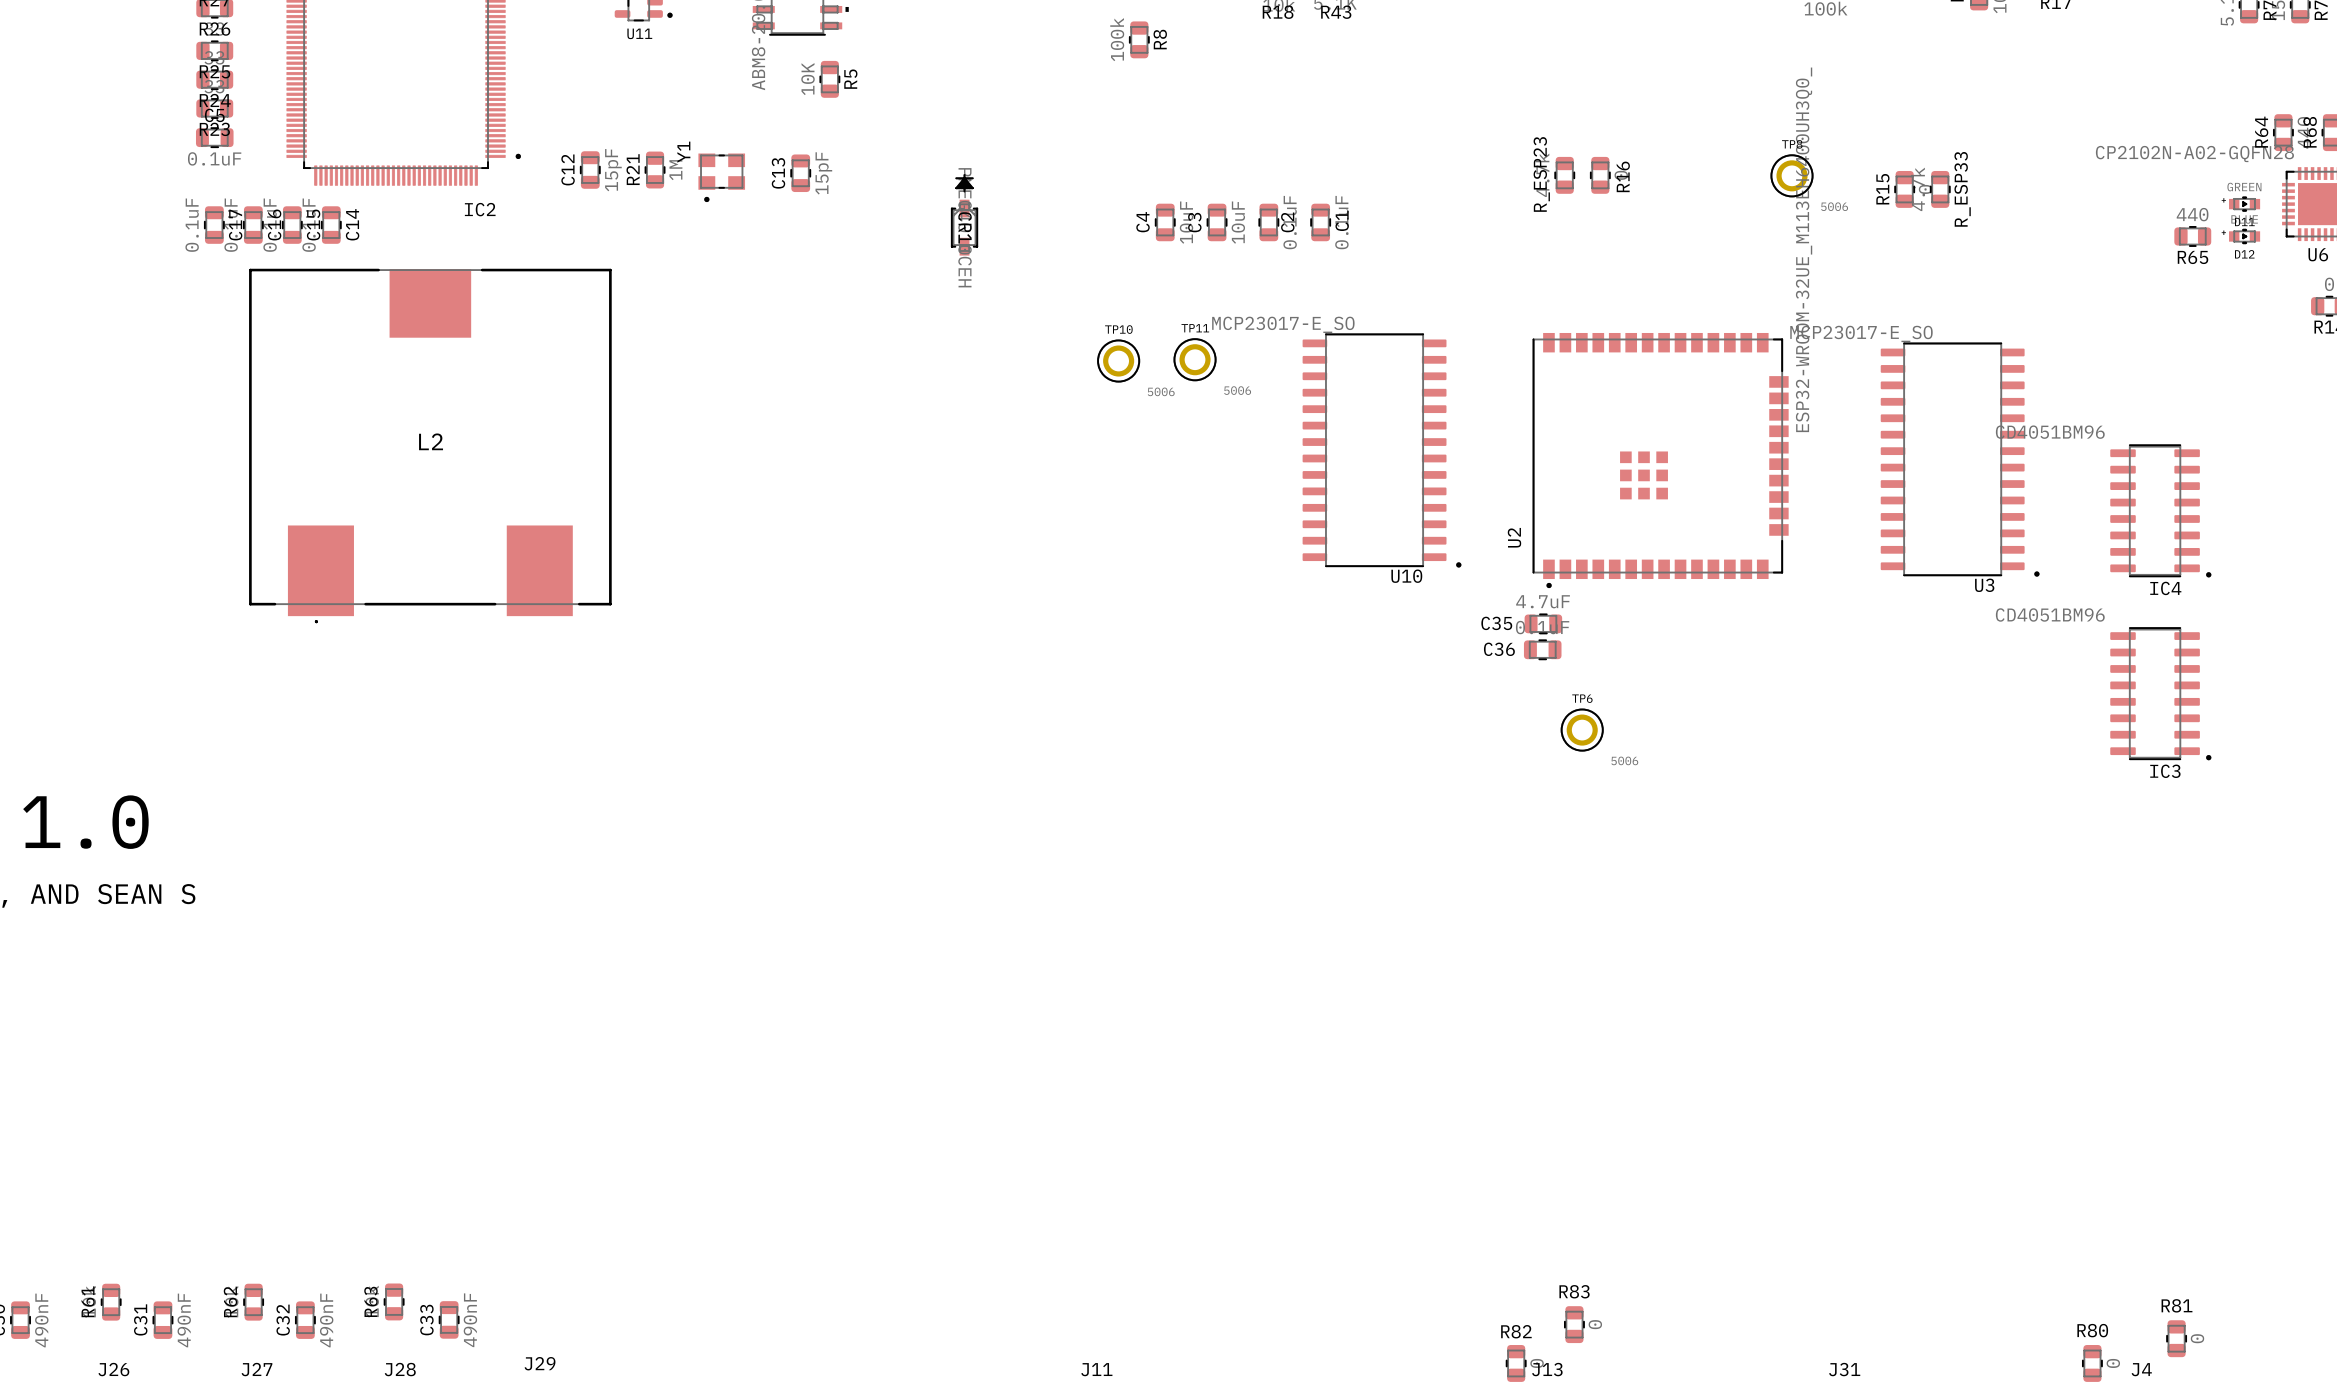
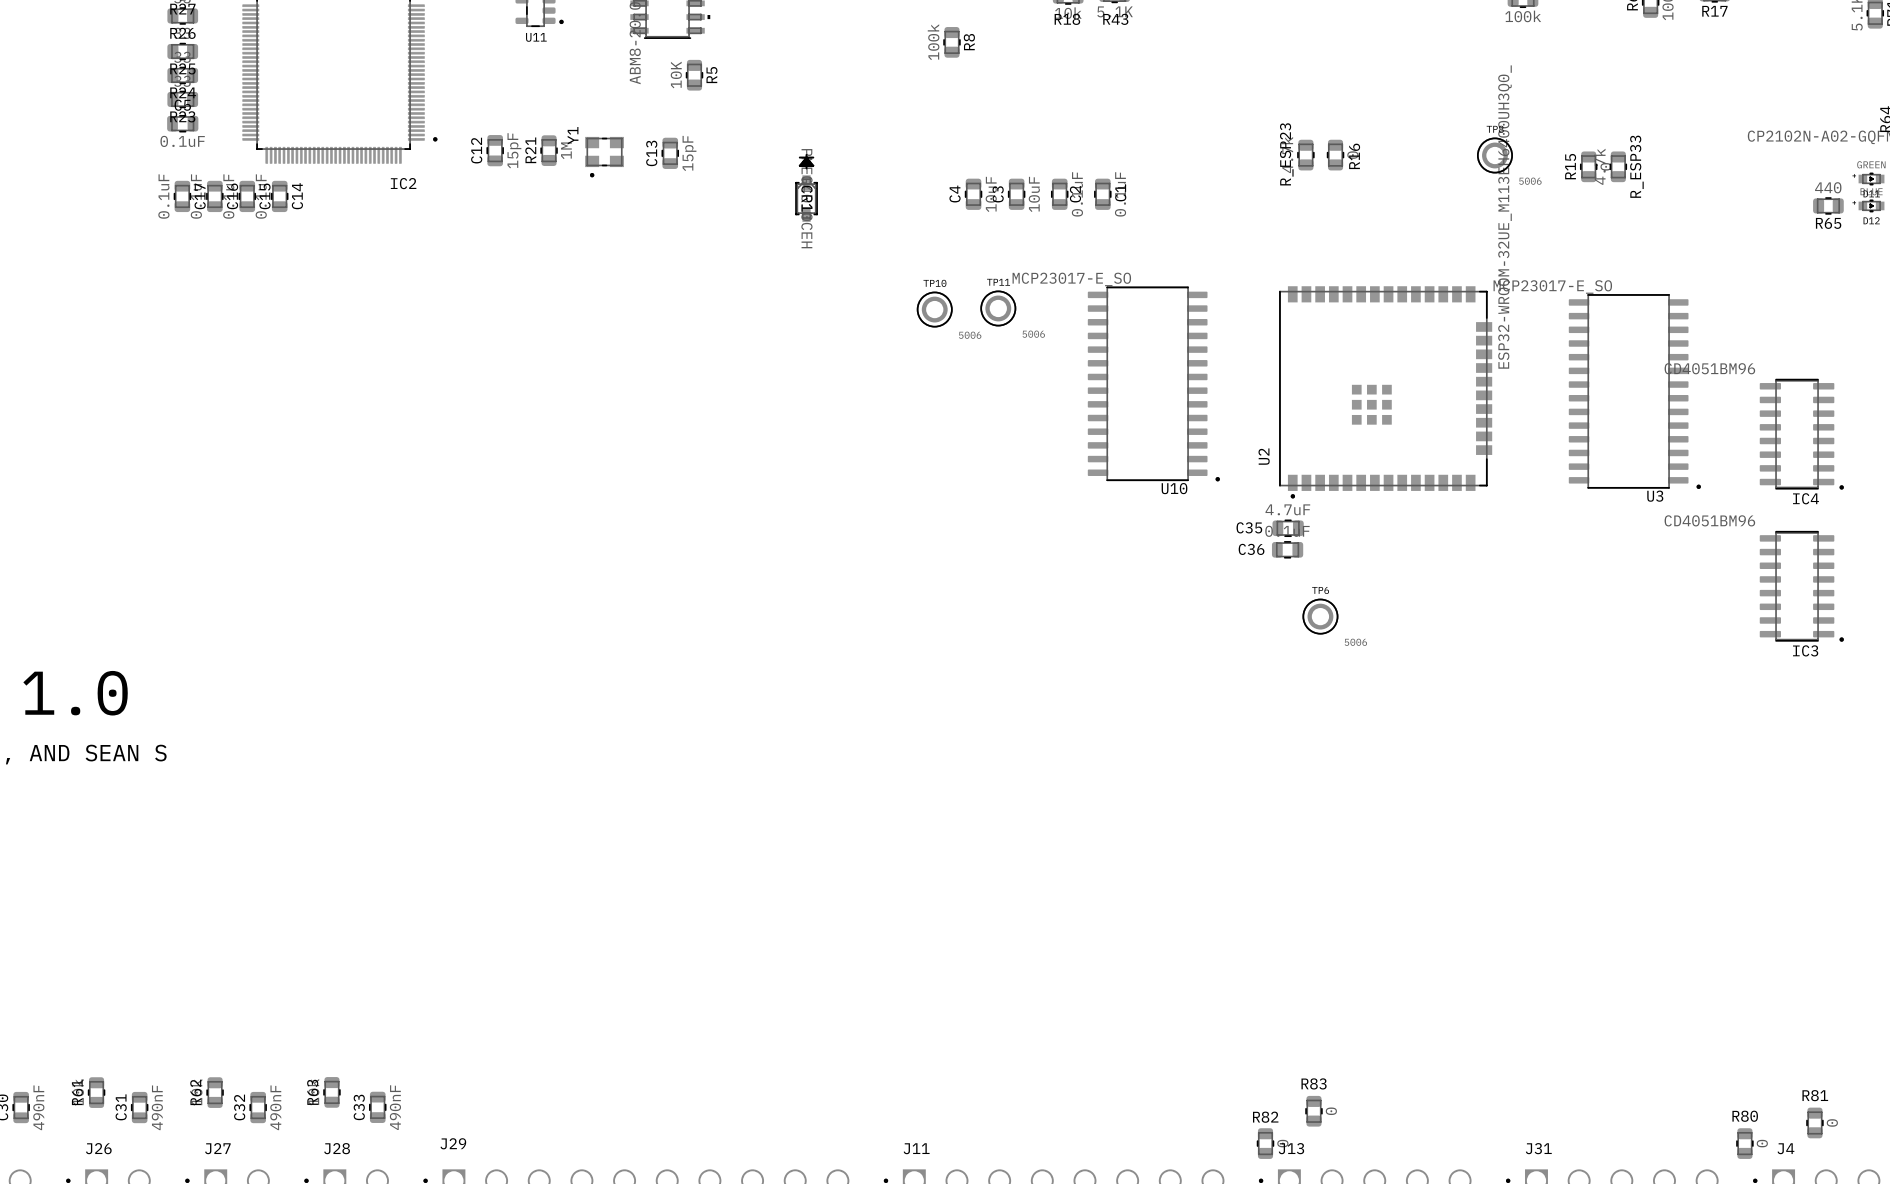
L2: (430, 445) -> none

